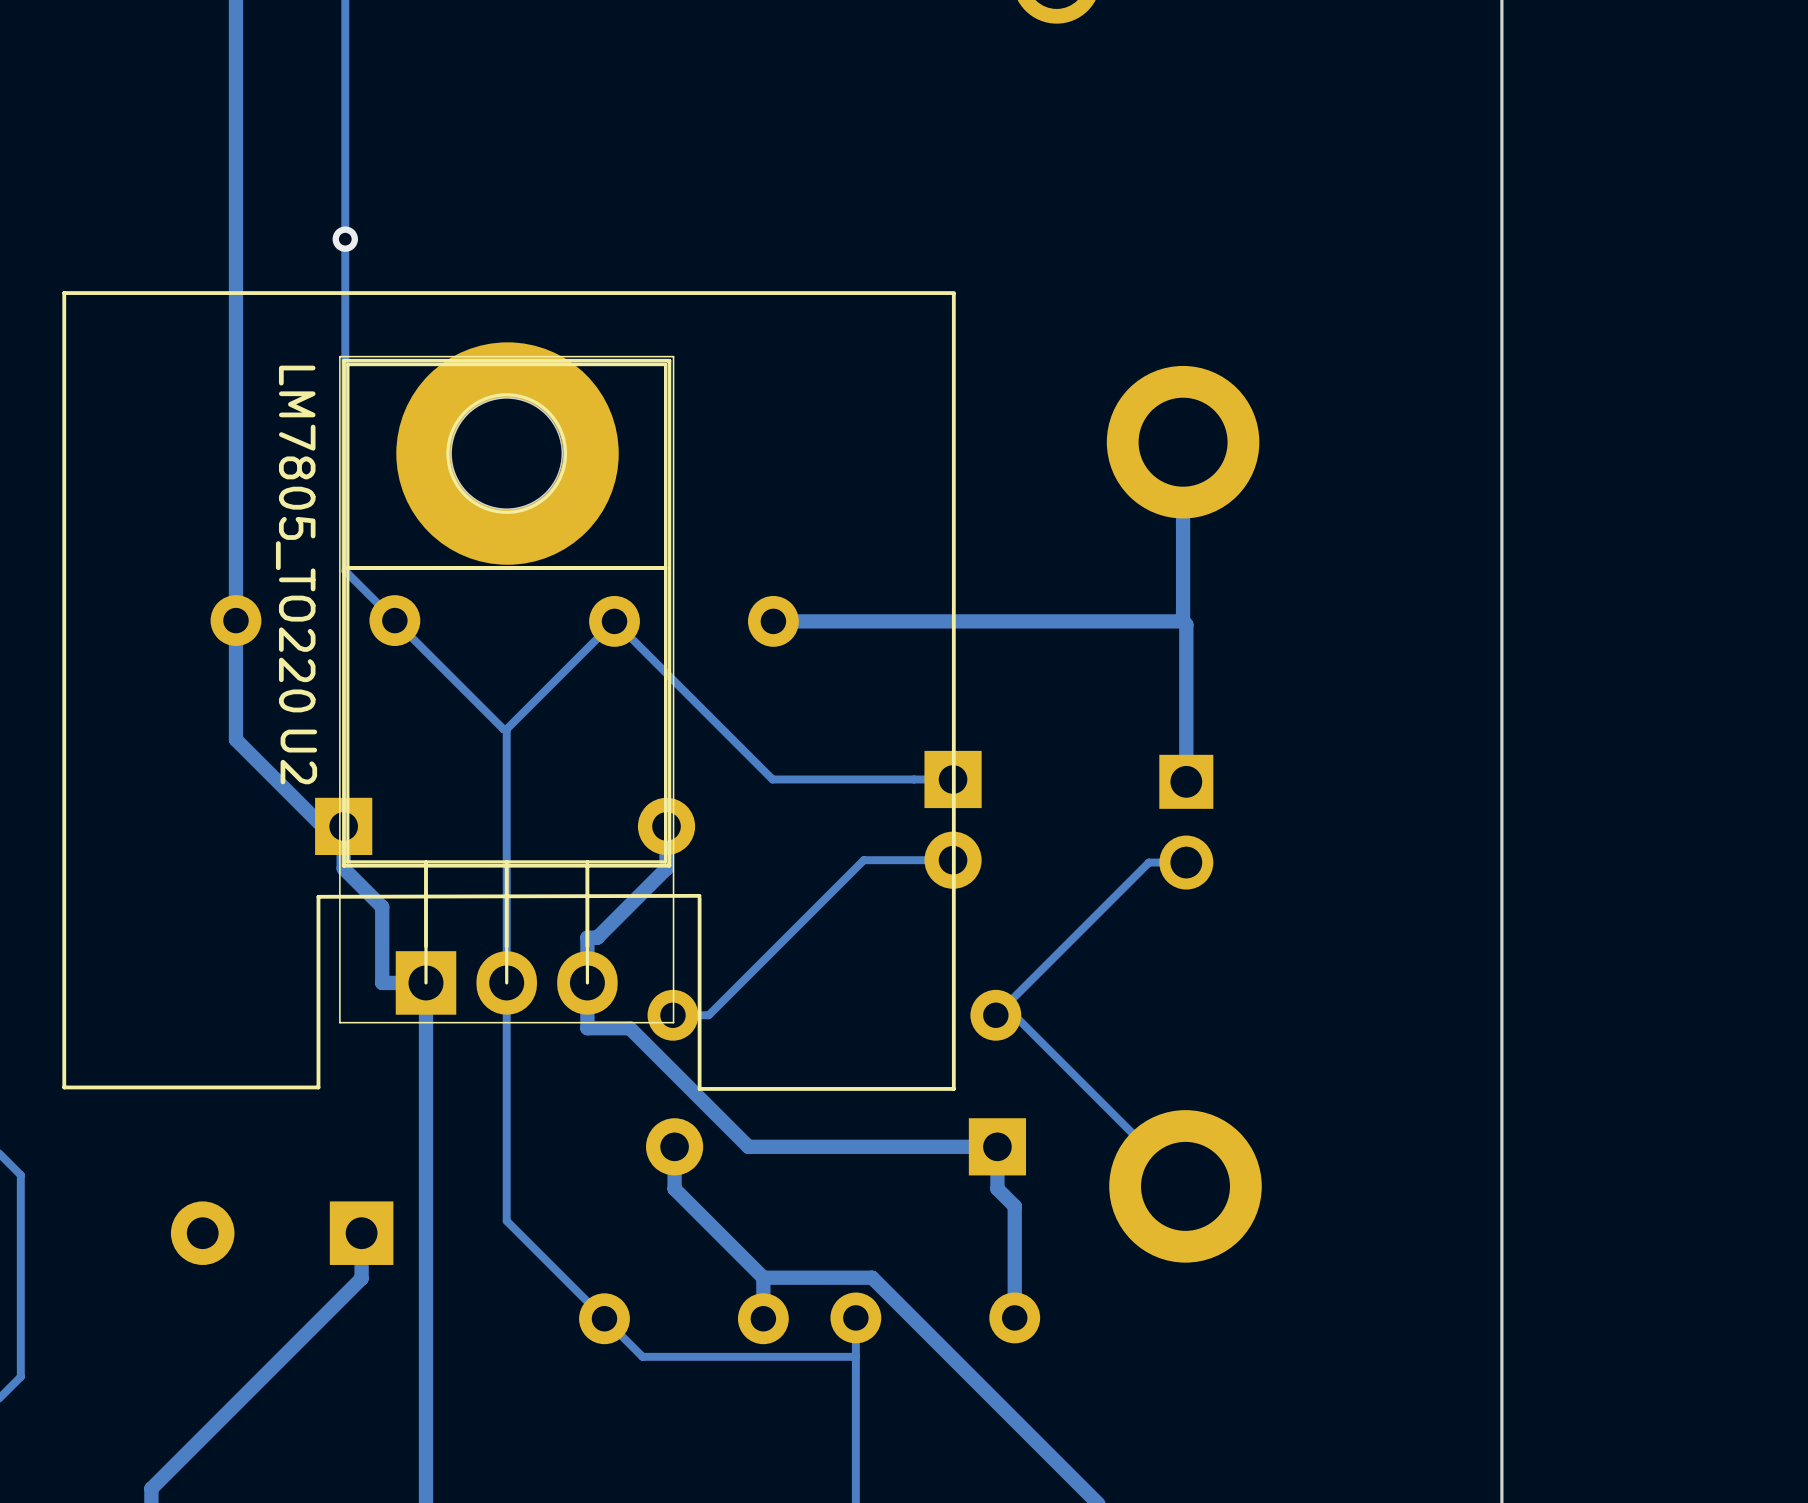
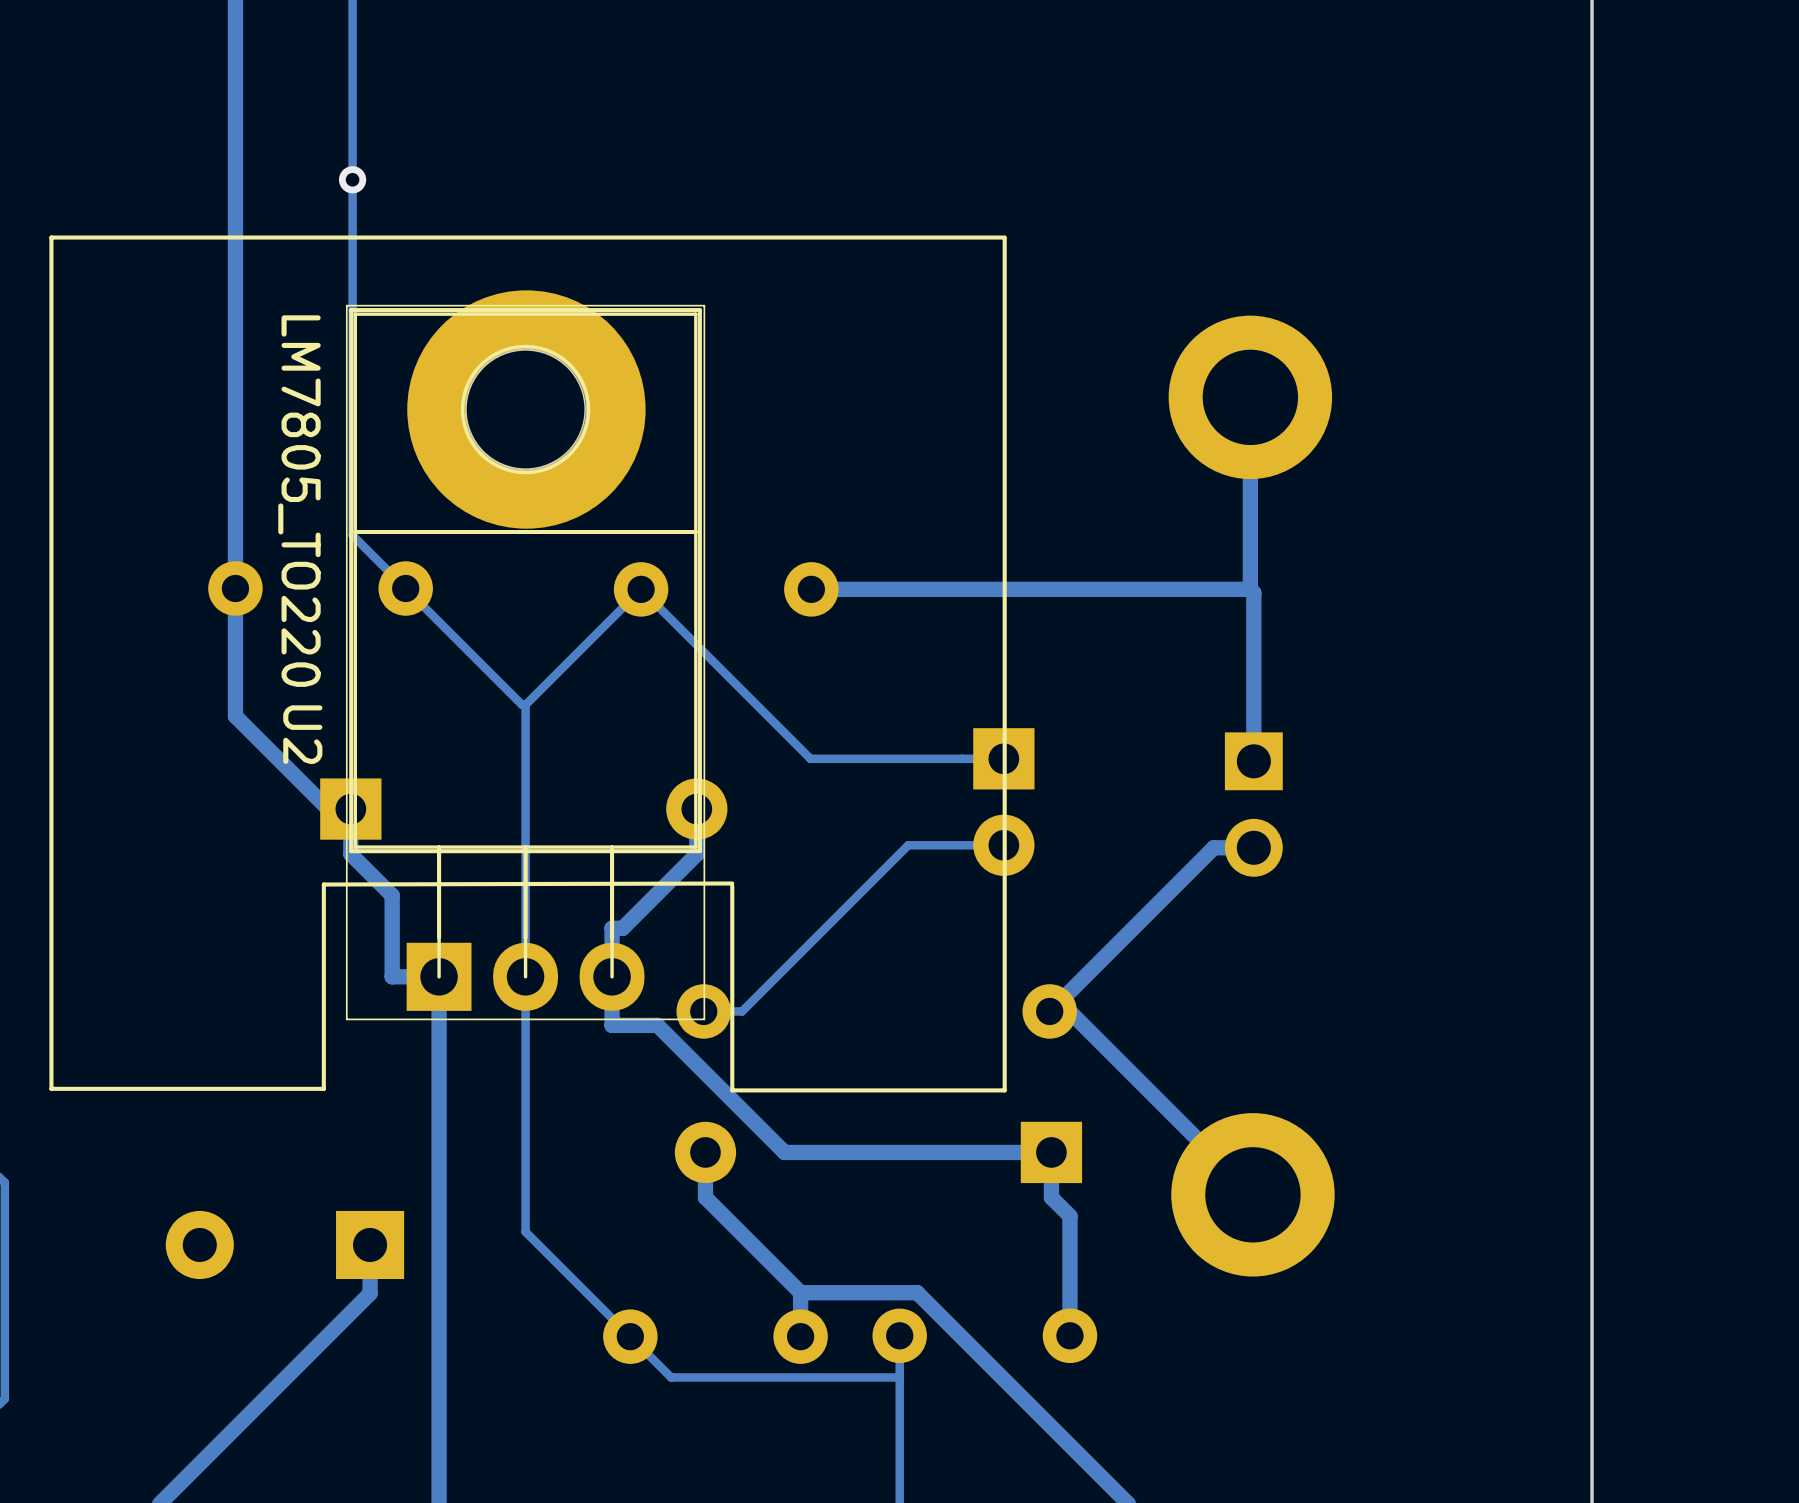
track width: thin (1186, 862) (1148, 862) (1005, 1006) -> thick (1253, 847) (1213, 847) (1059, 1001)
track width: thin (1005, 1006) (1185, 1186) -> thick (1059, 1001) (1252, 1194)

